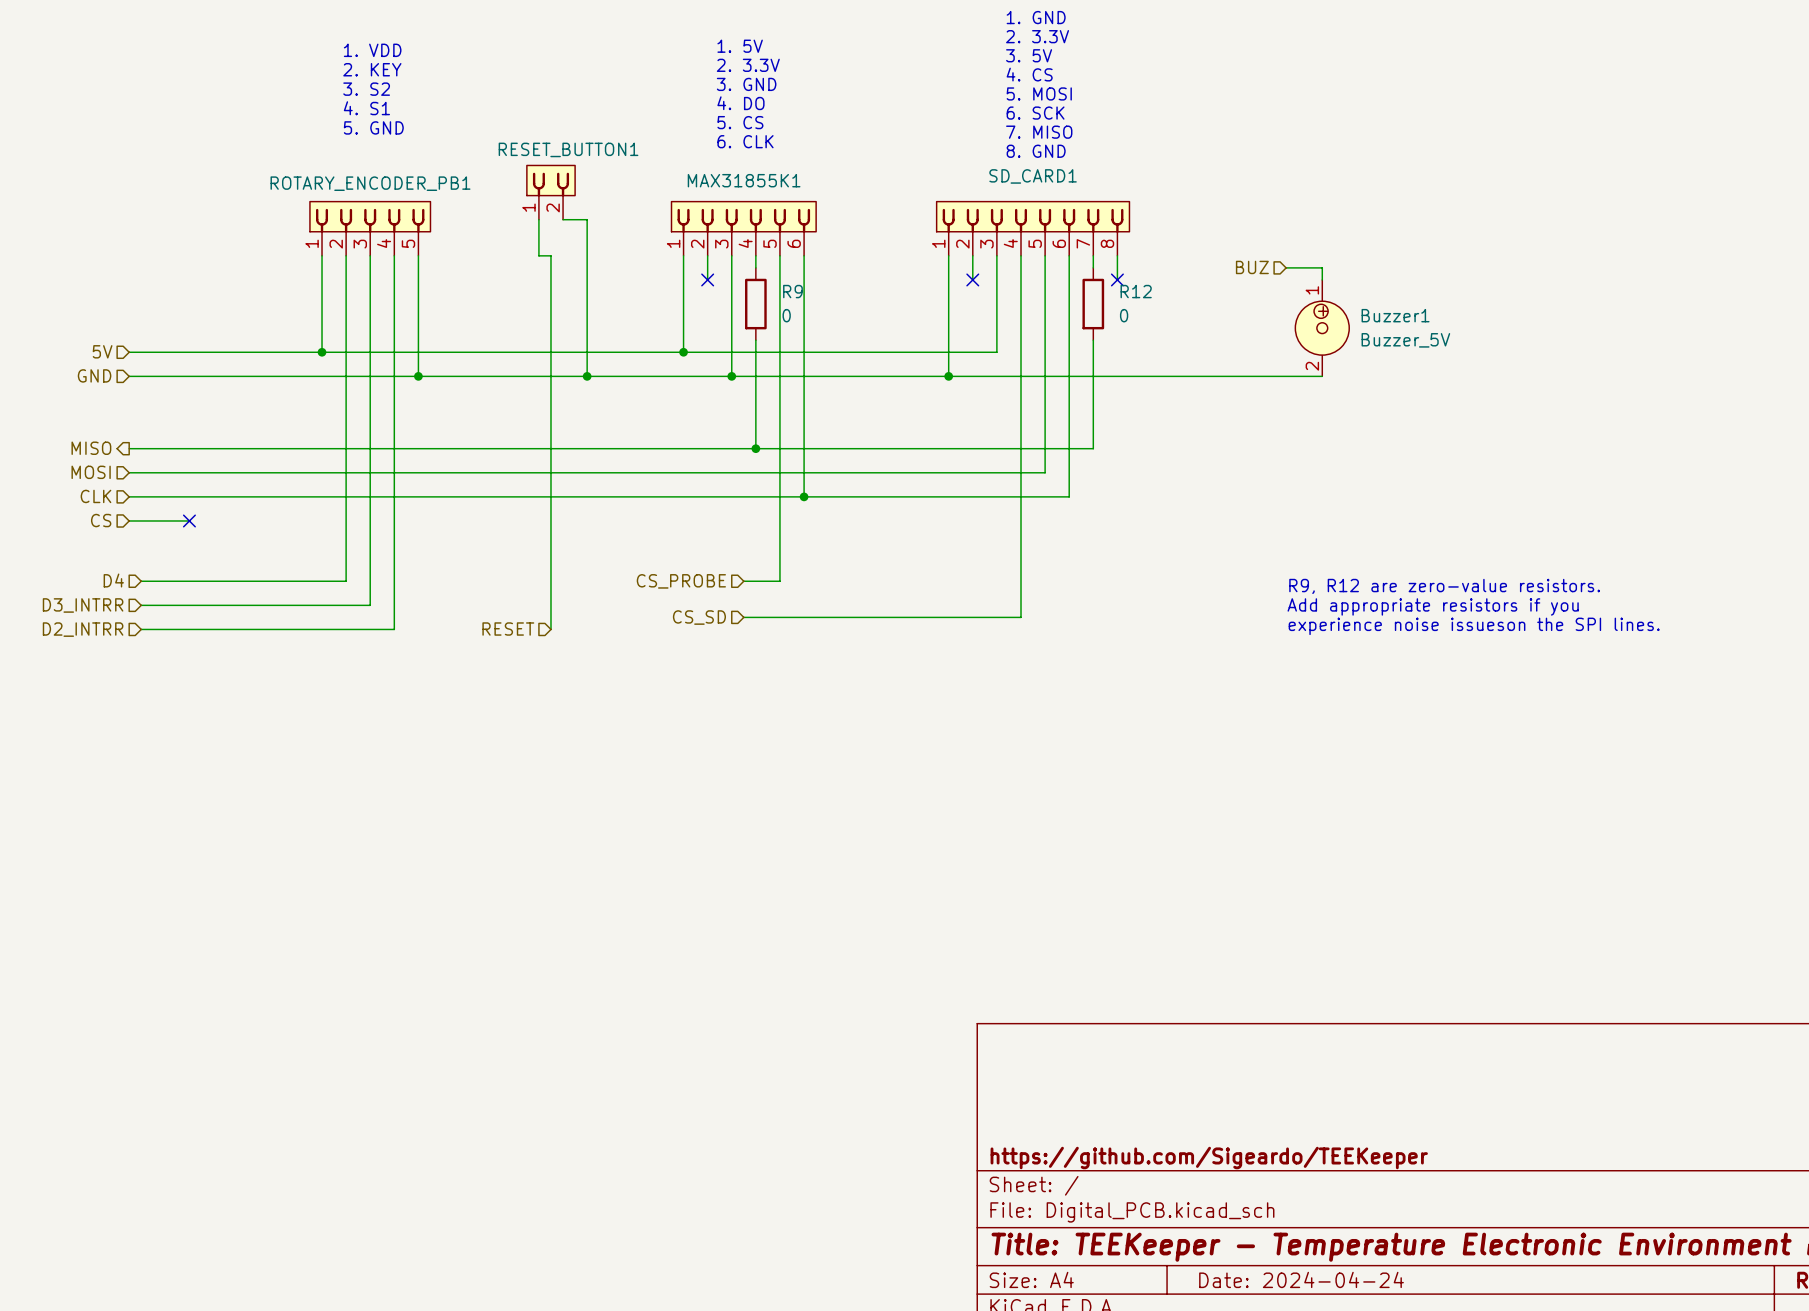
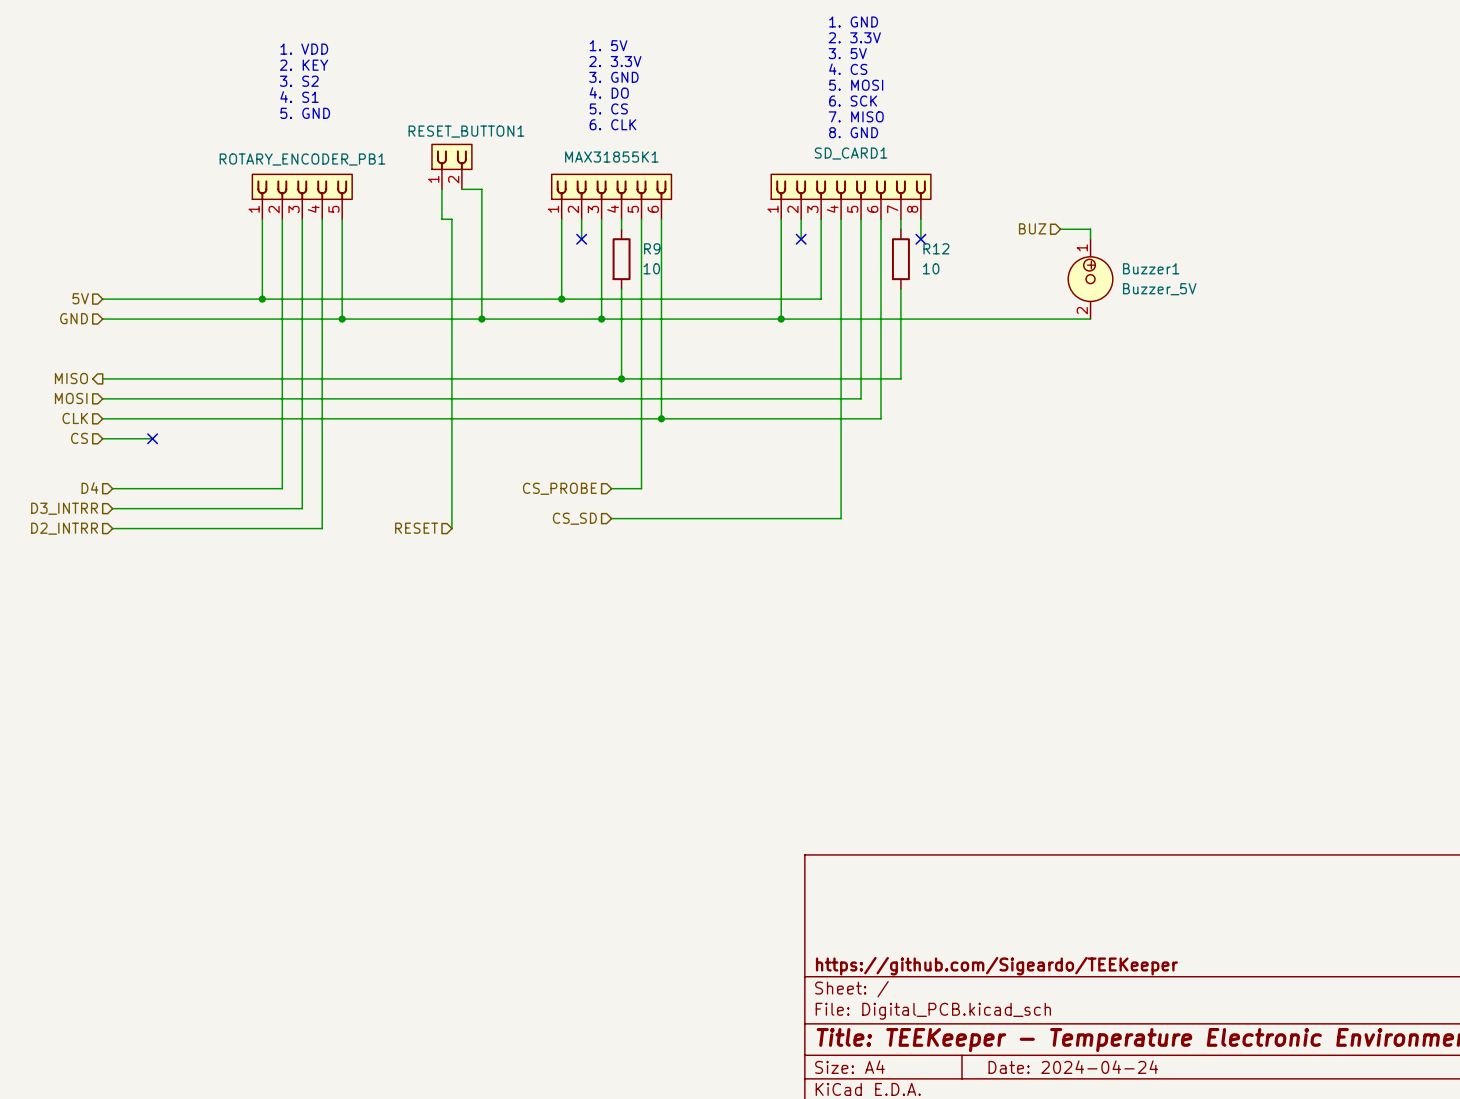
R9 value: 0 (786, 315) -> 10 (651, 268)
R12 value: 0 (1124, 315) -> 10 (931, 268)
text: R9, R12 are zero-value resistors. (1444, 586) -> none
text: Add appropriate resistors if you (1433, 606) -> none
text: experience noise issueson the SPI lines. (1474, 626) -> none

